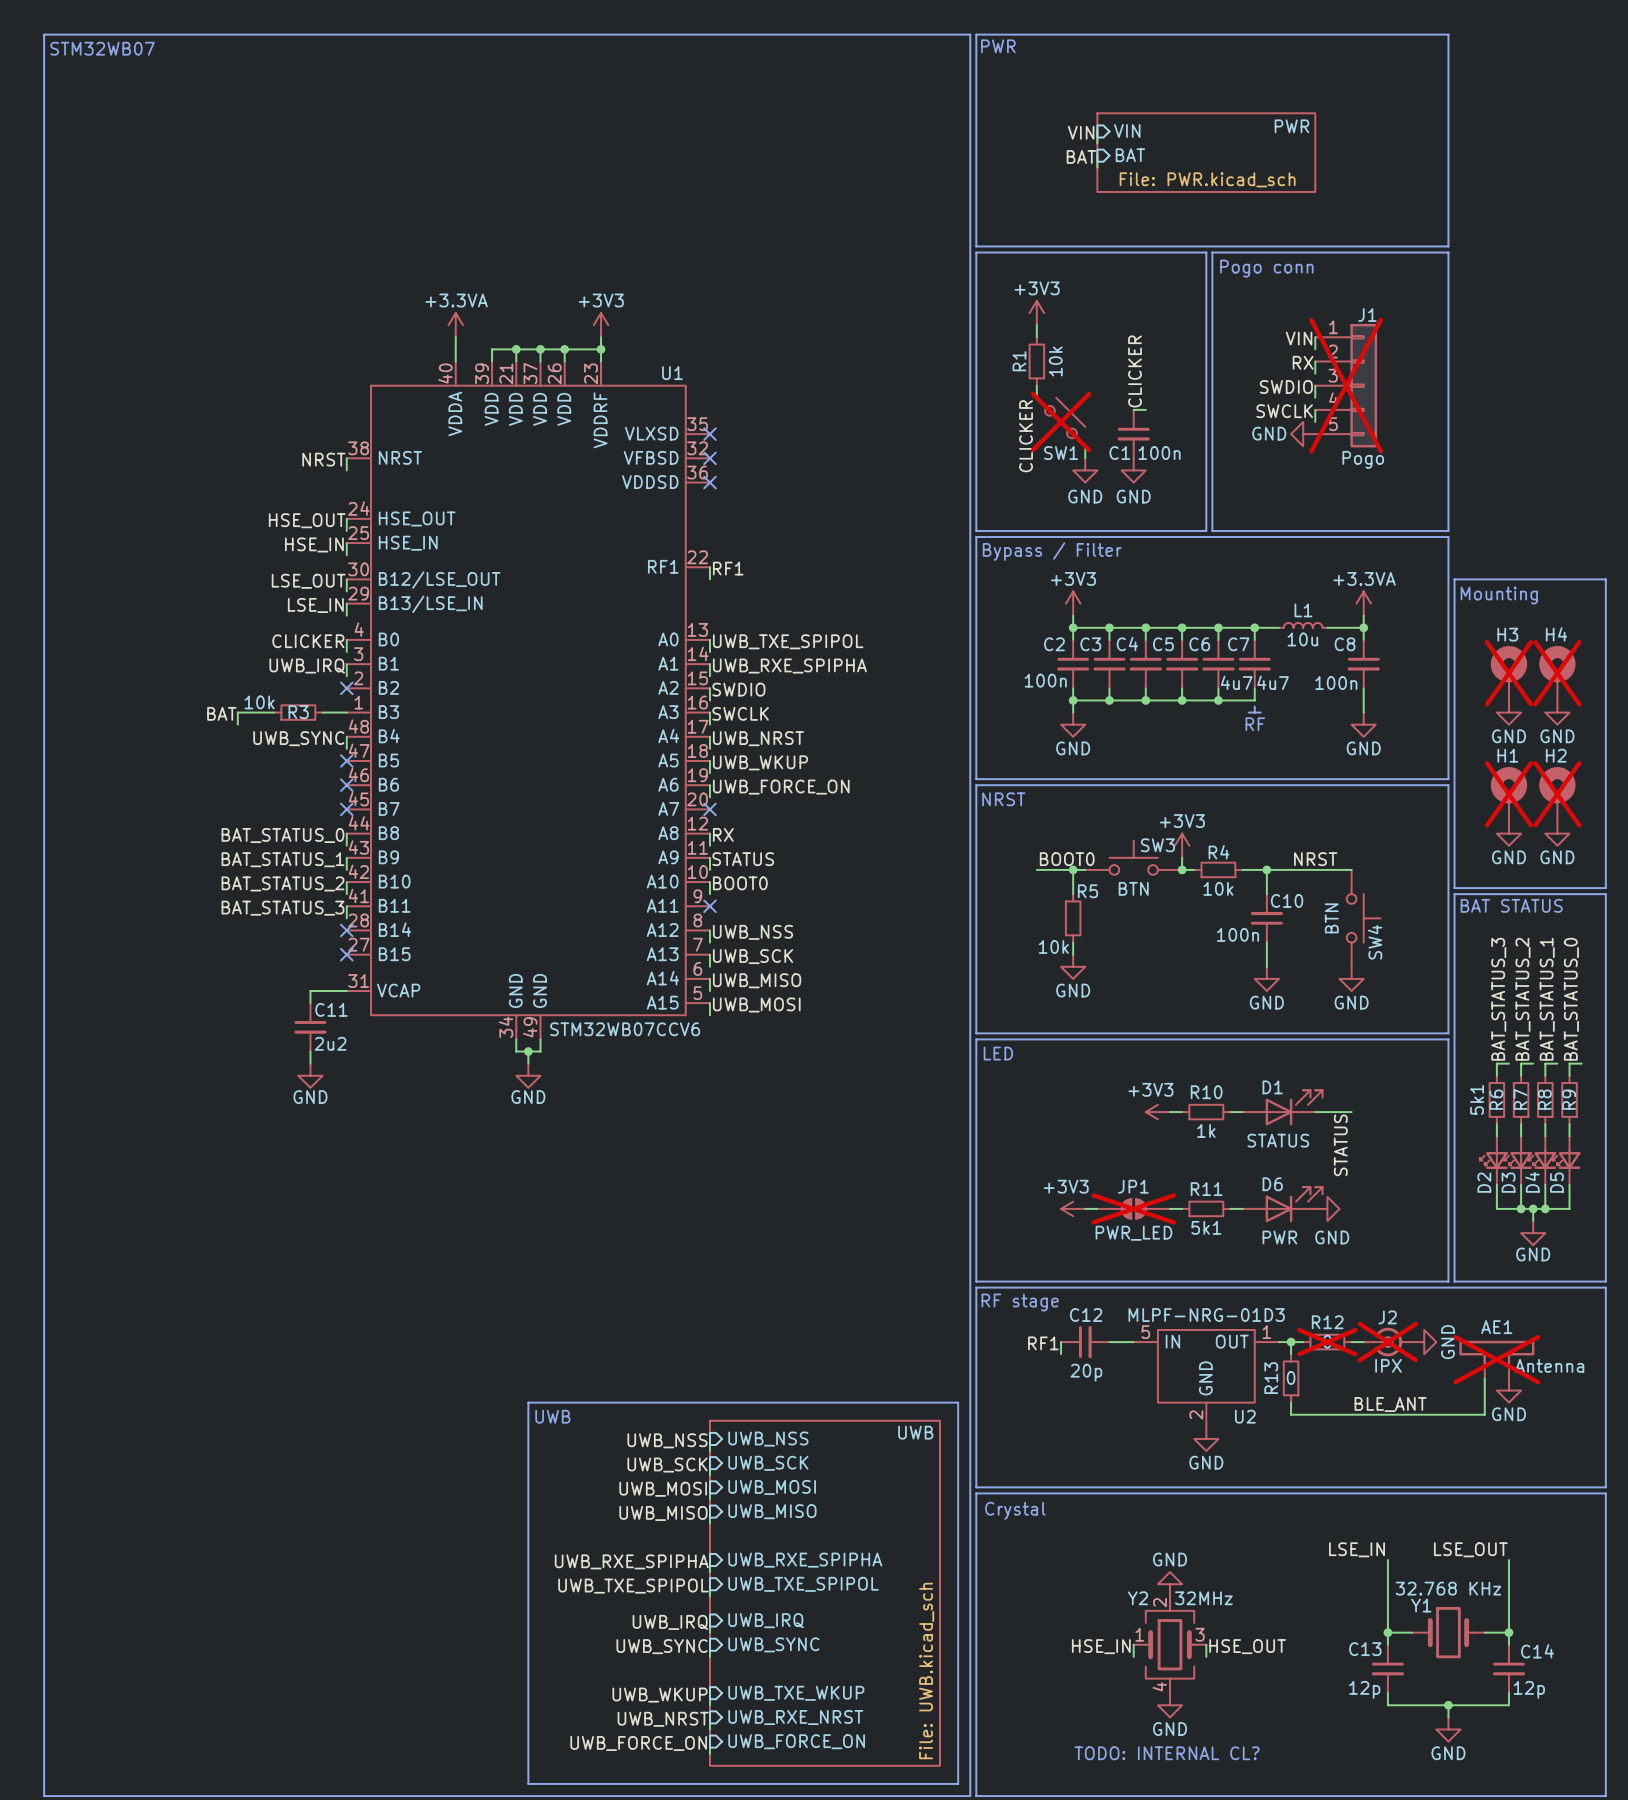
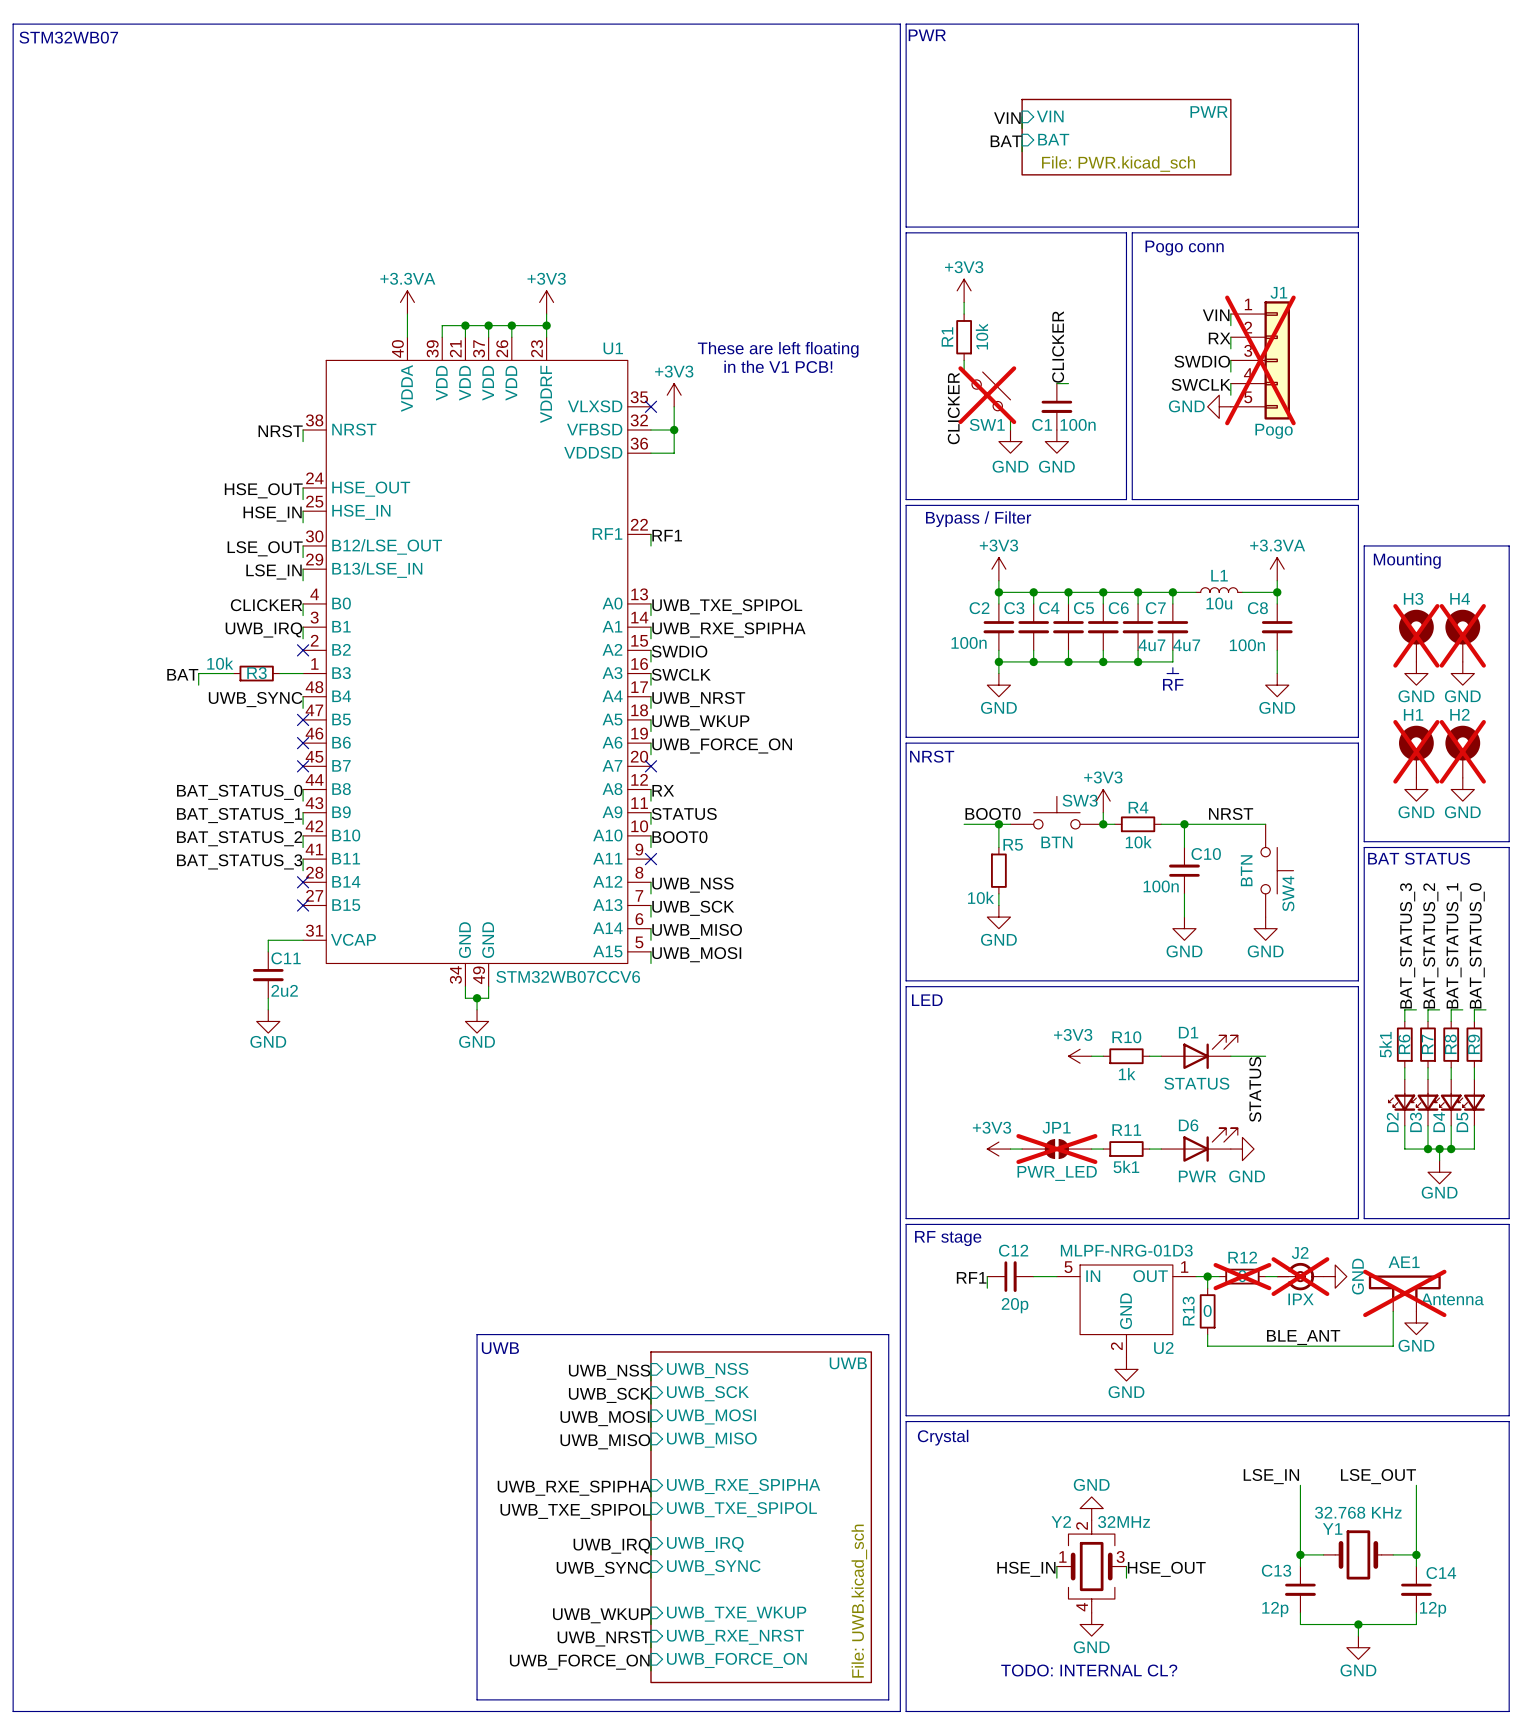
text: none -> These are left floating (778, 349)
text: none -> in the V1 PCB! (778, 366)
power symbol: none -> +3V3 (674, 395)
wire: none -> (674, 406) (674, 453) (650, 453)
wire: none -> (650, 430) (674, 430)
no-connect mark: (709, 458) -> none
junction: none -> (674, 430)
no-connect mark: (709, 482) -> none

